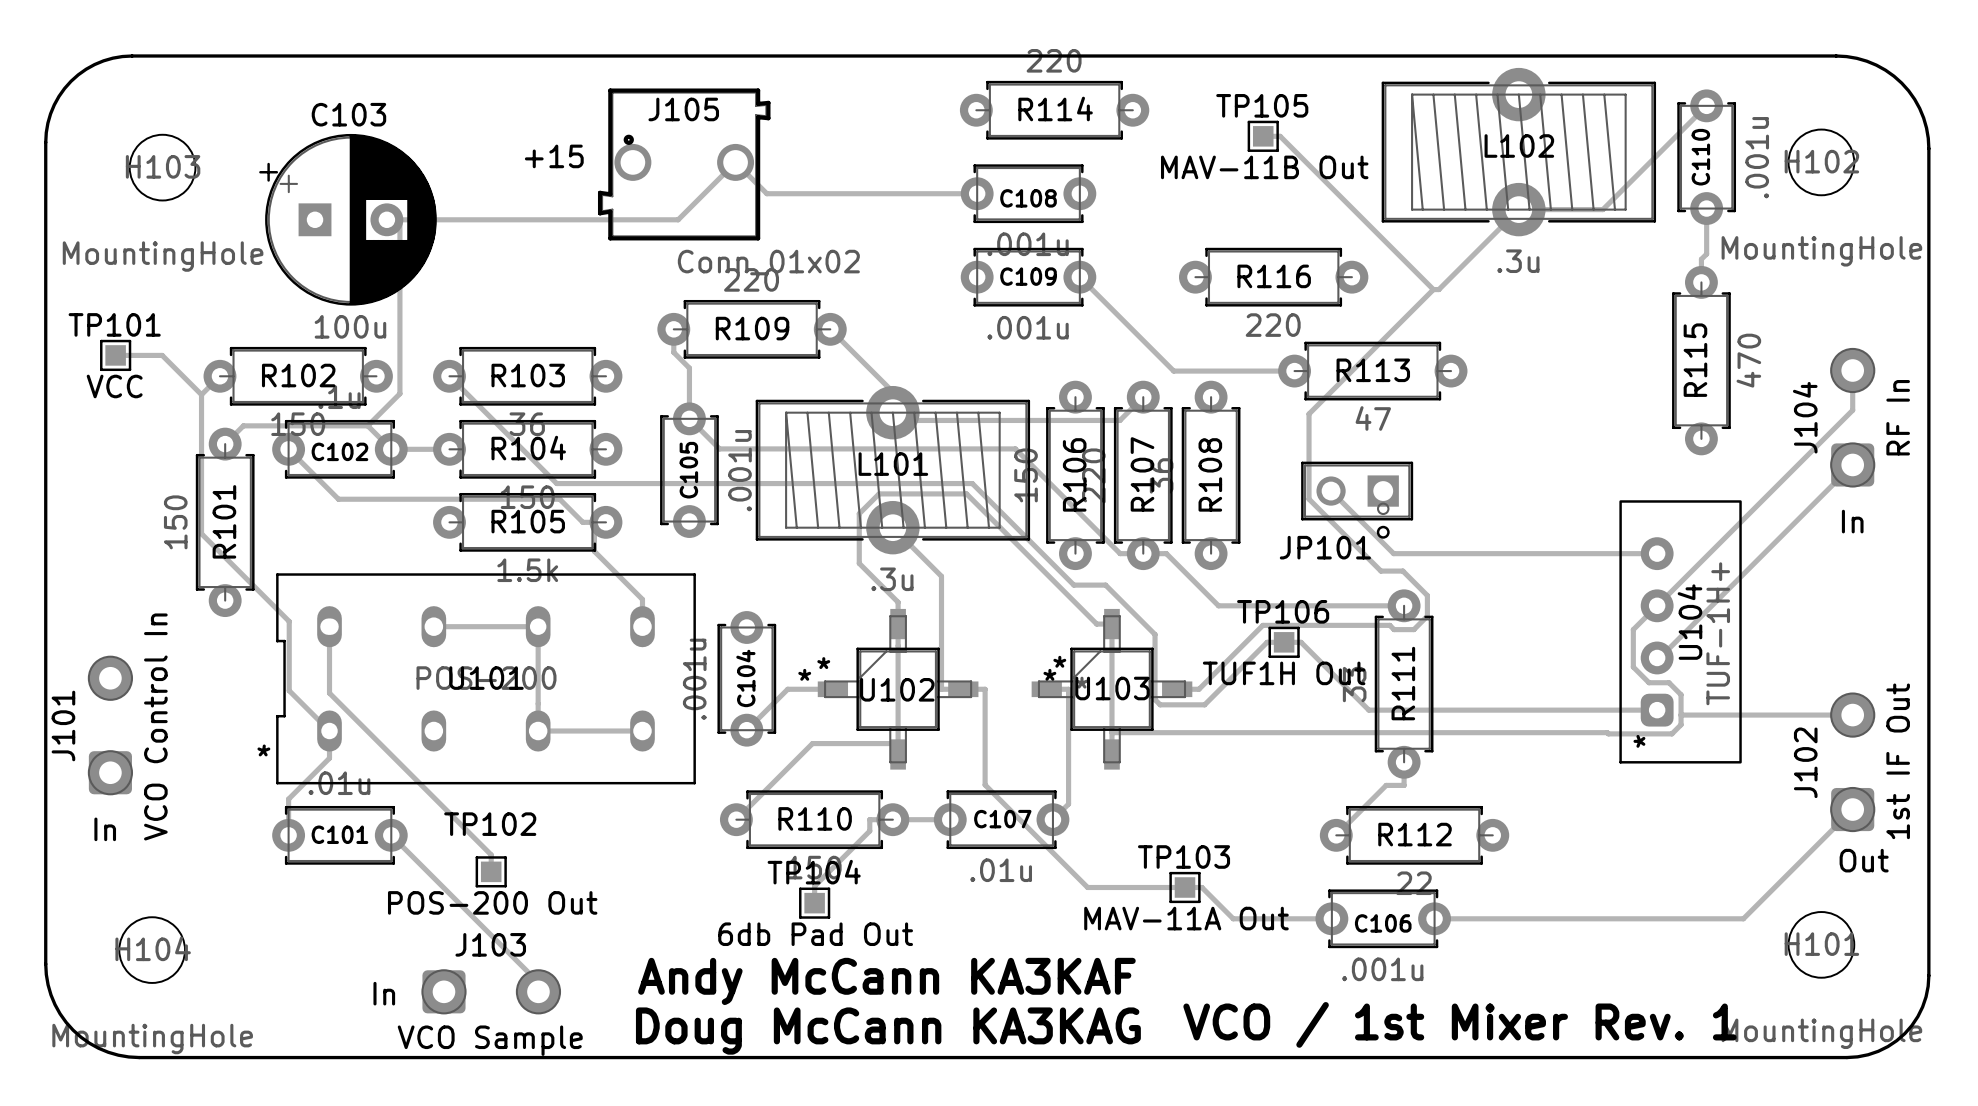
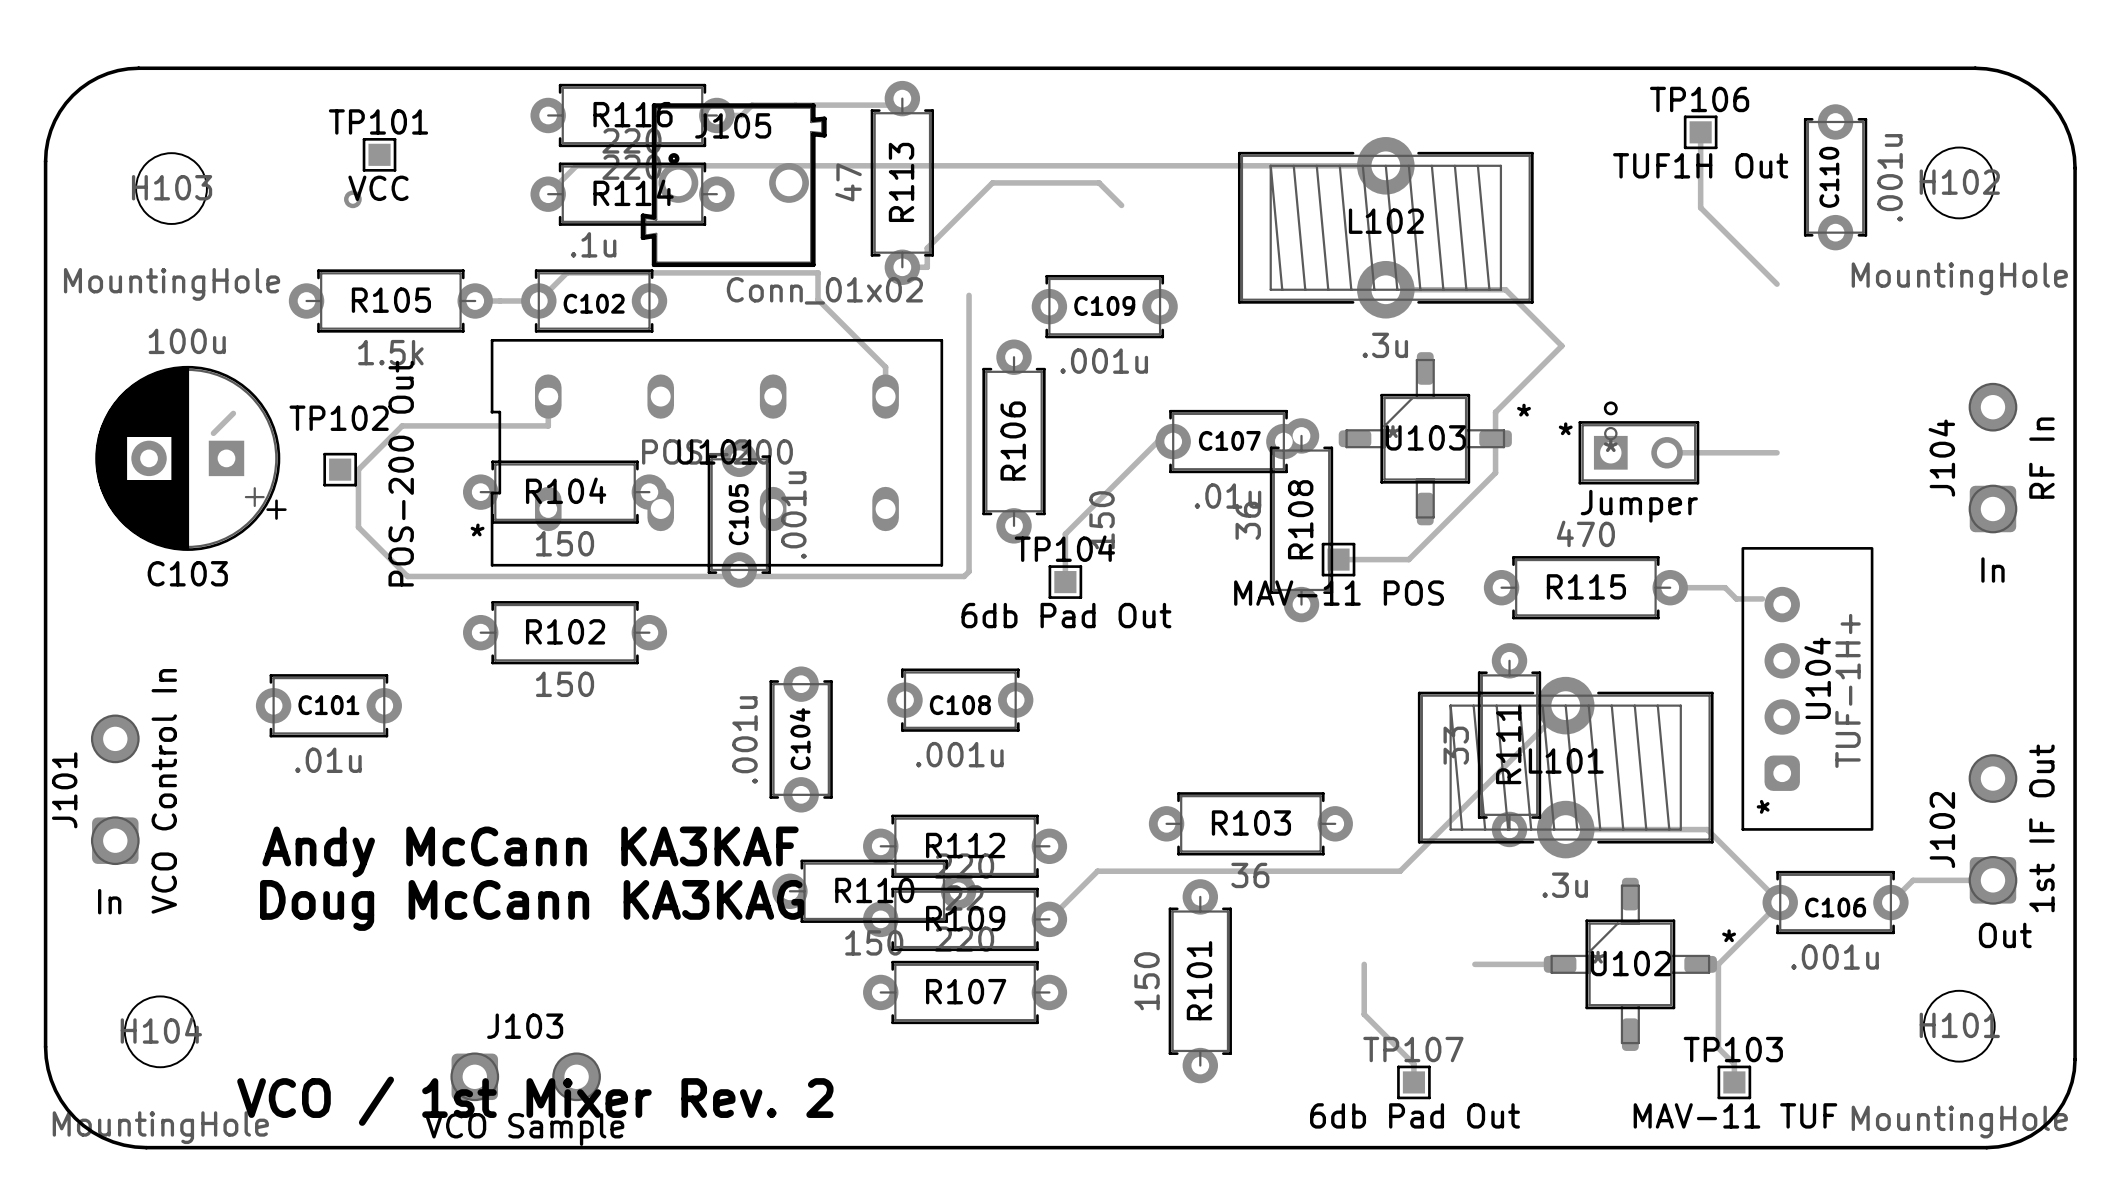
track: none -> (902, 98) (895, 105) (752, 105) (741, 115) (716, 115)
track: (1706, 105) (1602, 209) (1518, 209) (1438, 289) (1433, 289) -> none
R114 position: (1054, 110) -> (632, 194)
track: none -> (1700, 132) (1700, 207) (1777, 284)
track: (1263, 136) (1280, 136) (1433, 289) -> none
TP105: MAV-11B Out (1263, 136) -> none
track: none -> (1385, 165) (576, 165) (548, 194)
L102 position: (1518, 152) -> (1385, 227)
text: +15 (554, 156) -> none
via: none -> (352, 199)
track: none -> (1121, 205) (1099, 182) (992, 182) (927, 248) (927, 267) (902, 267)
track: (977, 193) (766, 193) (735, 162) (678, 219) (386, 219) -> none
C108 position: (1028, 193) -> (960, 700)
track: (1706, 208) (1706, 254) (1701, 259) (1701, 282) -> none
C103 rotation: 0° (347, 219) -> 180° (190, 458)
C103 position: (347, 219) -> (190, 458)
track: (399, 219) (399, 393) (367, 425) -> none
track: none -> (1385, 289) (1505, 289) (1561, 345) (1495, 412) (1495, 472) (1408, 559) (1338, 559)
track: none -> (969, 295) (969, 571) (964, 576) (407, 576) (358, 527) (358, 469) (402, 425) (548, 425) (548, 396)
track: none -> (475, 300) (538, 300) (566, 272) (818, 272) (818, 299) (885, 367) (885, 396)
track: (1079, 277) (1173, 371) (1294, 371) -> none
R116 position: (1273, 277) -> (632, 115)
track: (1433, 289) (1309, 413) (1309, 499) (1380, 571) (1402, 571) (1427, 595) (1427, 616) (1413, 629) (1394, 629) (1389, 625) (1262, 625) (1198, 689) (1177, 689) -> none
track: (673, 329) (673, 352) (689, 368) (689, 418) (719, 448) (1015, 448) (1120, 553) (1166, 553) (1218, 605) (1404, 605) -> none
R109 position: (752, 329) -> (965, 919)
track: (830, 329) (892, 391) (892, 412) (900, 420) (1119, 420) (1143, 397) -> none
track: (115, 355) (162, 355) (201, 394) (201, 533) (289, 621) (289, 690) (329, 731) (329, 758) (288, 799) (288, 835) -> none
TP101 position: (115, 355) -> (379, 154)
R115 rotation: 0° (1701, 360) -> 90° clockwise (1585, 587)
R115 position: (1701, 360) -> (1585, 587)
R115 value position: 470 (1748, 360) -> 470 (1585, 533)
track: (1852, 370) (1852, 410) (1633, 629) (1633, 667) (1648, 682) (1669, 682) (1681, 694) (1681, 724) (1671, 733) (1111, 732) -> none
R113 rotation: 0° (1372, 371) -> 90° clockwise (902, 182)
R113 position: (1372, 371) -> (902, 182)
R102 position: (298, 376) -> (565, 632)
track: (449, 376) (556, 483) (972, 483) (1073, 585) (1105, 585) (1155, 634) (1155, 699) (1160, 704) (1204, 704) (1267, 642) (1301, 642) (1368, 710) (1657, 710) -> none
R103 position: (527, 376) -> (1250, 823)
track: none -> (1173, 441) (1157, 441) (1065, 534) (1065, 582)
part: none -> Jumper (1638, 442)
track: none -> (1667, 452) (1777, 452)
track: (367, 425) (391, 449) (449, 449) -> none
track: (367, 425) (243, 425) (225, 444) -> none
track: (288, 449) (338, 499) (559, 499) (582, 522) (605, 522) -> none
C102 position: (339, 449) -> (594, 300)
track: (1852, 464) (1659, 657) (1657, 657) -> none
L101 position: (892, 470) -> (1565, 767)
R106 position: (1075, 475) -> (1014, 441)
R107 rotation: 0° (1143, 475) -> 90° clockwise (965, 992)
R107 position: (1143, 475) -> (965, 992)
track: (1331, 491) (1393, 553) (1657, 553) -> none
JP101: (1357, 500) -> none
part: none -> MAV-11 POS (1338, 559)
R101 position: (225, 522) -> (1200, 981)
R105 position: (527, 522) -> (390, 300)
track: (594, 522) (594, 551) (642, 599) (642, 626) -> none
track: (892, 527) (941, 576) (941, 689) (985, 689) (985, 784) (1087, 887) (1201, 887) (1233, 918) (1331, 918) -> none
track: none -> (1670, 587) (1725, 587) (1736, 598) (1762, 598)
U102 footprint: [817, 608, 979, 770] -> [1543, 877, 1717, 1051]
U103 footprint: [1031, 608, 1193, 770] -> [1338, 352, 1512, 526]
track: (329, 626) (329, 693) (491, 854) (491, 871) -> none
track: (433, 626) (538, 626) (538, 731) (642, 731) -> none
TP106 position: (1284, 642) -> (1700, 132)
track: none -> (1565, 705) (1400, 871) (1097, 871) (1049, 919)
U101 position: (485, 678) -> (716, 452)
track: (832, 689) (787, 689) (746, 730) -> none
track: (1046, 689) (1068, 689) (1068, 804) (1052, 819) -> none
track: (1681, 715) (1852, 715) -> none
track: (898, 743) (812, 743) (736, 819) -> none
track: (898, 754) (898, 602) (859, 563) (859, 513) (879, 493) (966, 493) (1096, 624) (1111, 624) (1111, 754) -> none
track: (1404, 762) (1404, 785) (1386, 785) (1336, 835) -> none
track: none -> (1565, 829) (1707, 829) (1780, 902) (1718, 964)
C101 value position: .01u (339, 783) -> .01u (328, 760)
track: (1852, 809) (1743, 918) (1434, 918) -> (1992, 880) (1913, 880) (1890, 902)
track: (950, 819) (869, 819) (869, 831) (814, 886) (814, 903) -> none
C107 position: (1001, 819) -> (1228, 441)
C101 position: (339, 835) -> (328, 705)
track: (391, 835) (538, 982) (538, 991) -> none
R112 position: (1414, 835) -> (965, 846)
TP102 position: (491, 871) -> (340, 469)
TP103 position: (1185, 887) -> (1734, 1082)
track: none -> (1364, 964) (1364, 1014) (1413, 1064) (1413, 1082)
track: none -> (1474, 964) (1560, 964)
track: none -> (1718, 964) (1718, 1048) (1734, 1064) (1734, 1082)
TP102 value rotation: 0° (492, 902) -> 90° counterclockwise (401, 473)
TP104 position: (814, 903) -> (1065, 582)
TP103 value: MAV-11A Out (1186, 918) -> MAV-11 TUF (1735, 1115)
C106 position: (1383, 918) -> (1835, 902)
text position: Andy McCann KA3KAF (886, 981) -> Andy McCann KA3KAF (530, 851)
text: In (384, 993) -> none
TP107: none -> 6db Pad Out (1413, 1082)
text: none -> VCO / 1st Mixer Rev. 2 (535, 1101)
text: VCO / 1st Mixer Rev. 1 (1460, 1024) -> none
text position: Doug McCann KA3KAG (888, 1031) -> Doug McCann KA3KAG (532, 905)

